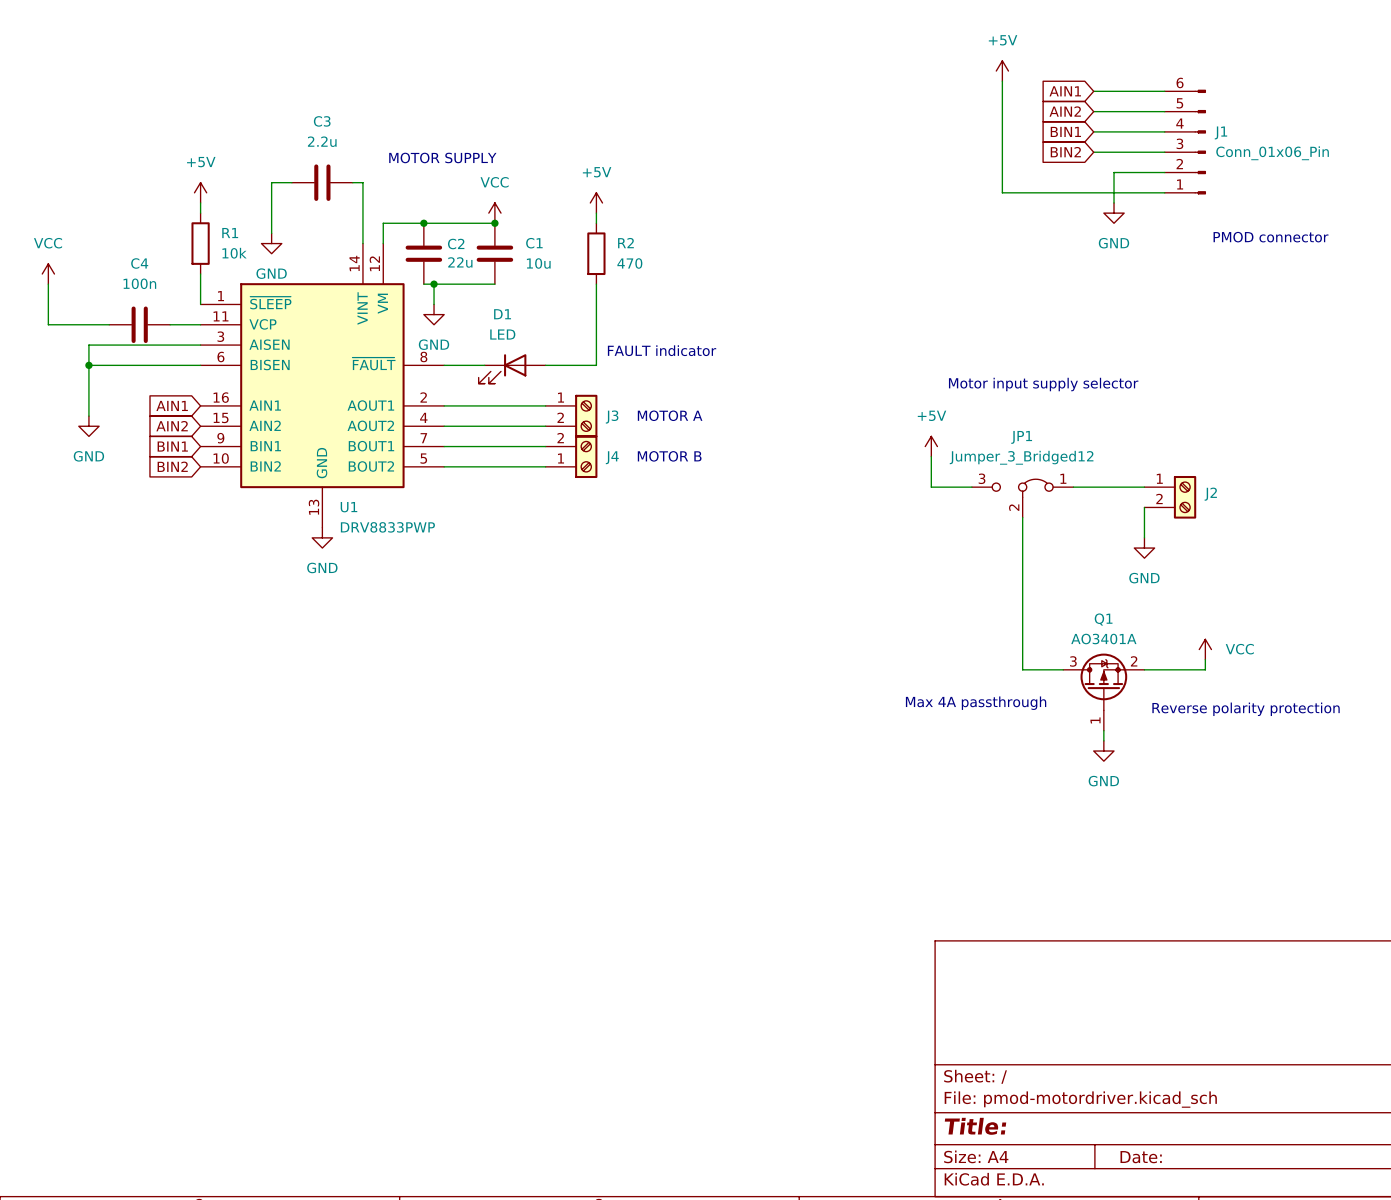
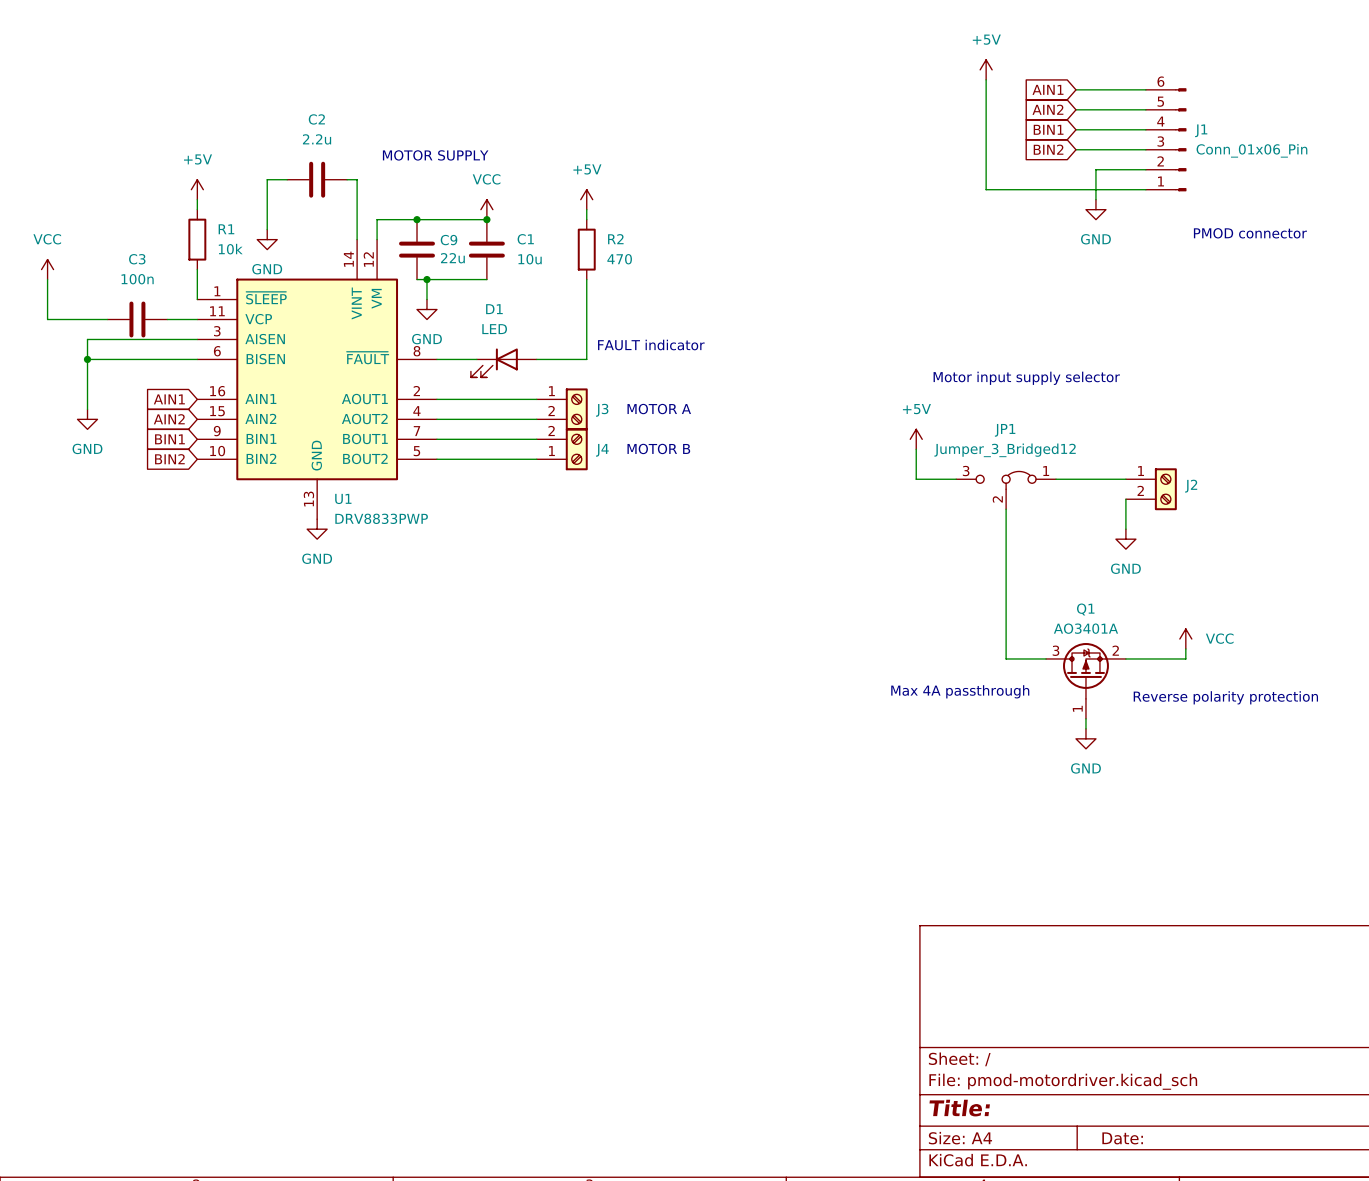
C3 name: C3 (322, 121) -> C2 (316, 119)
C2 name: C2 (456, 244) -> C9 (449, 240)
C4 name: C4 (139, 263) -> C3 (137, 259)

